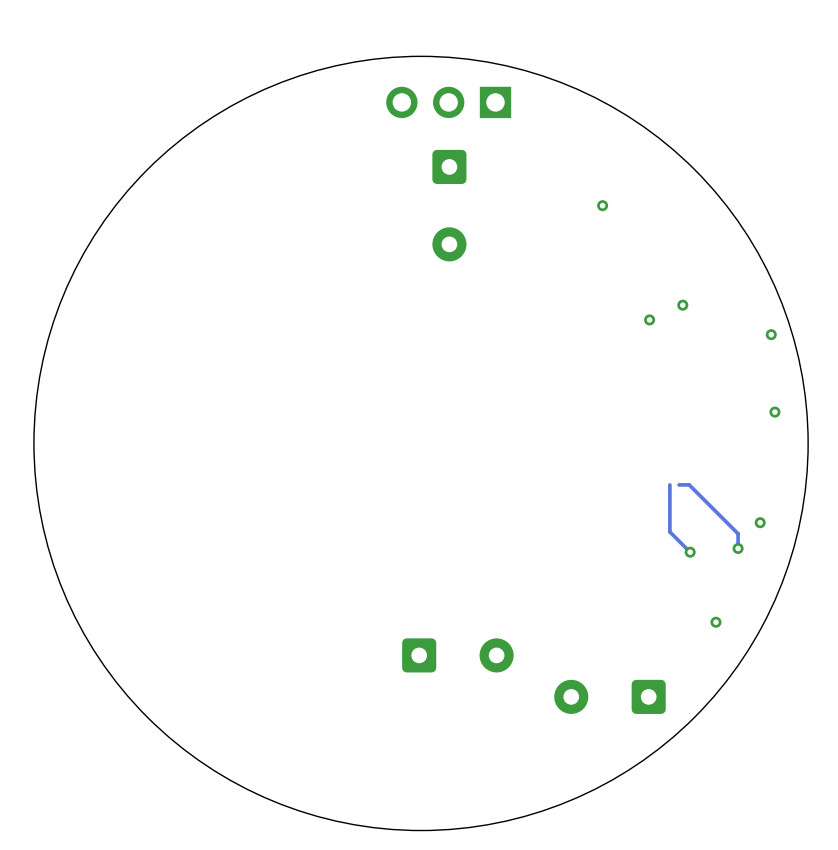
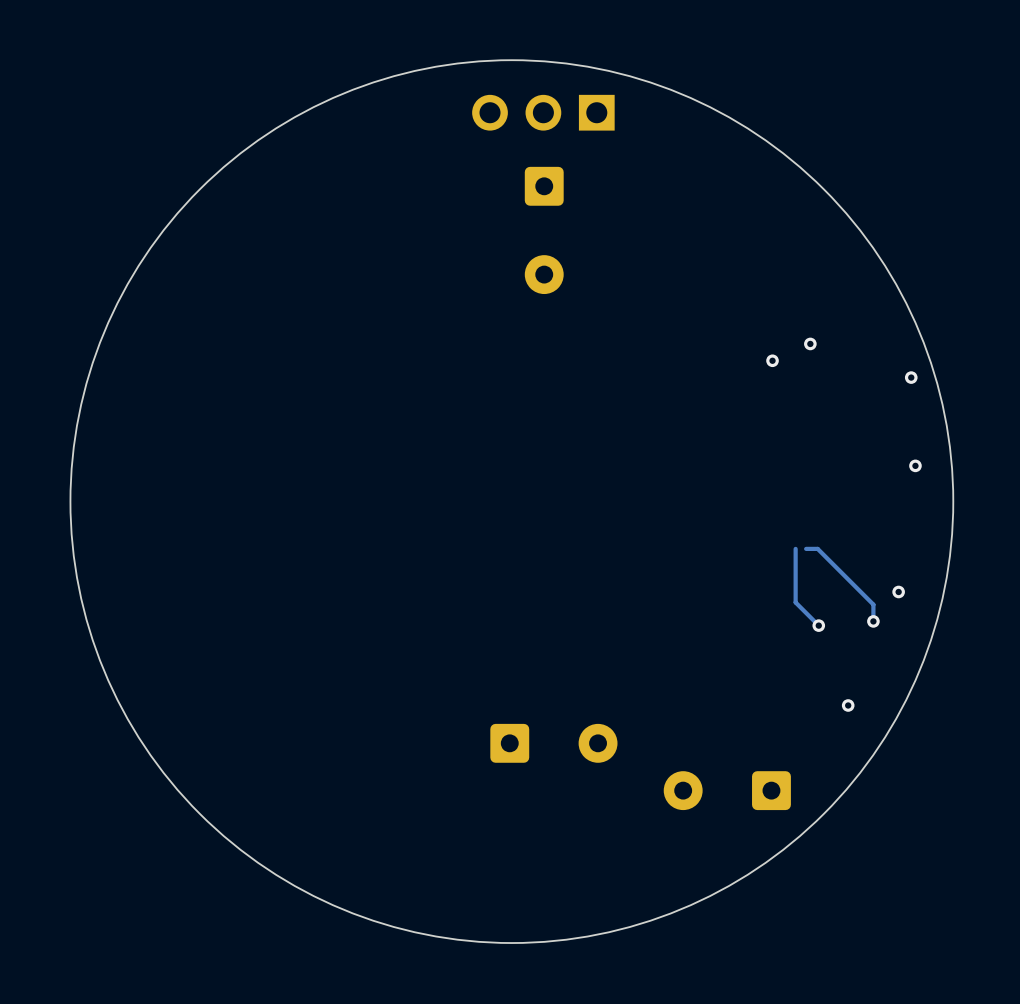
via: (602, 205) -> none

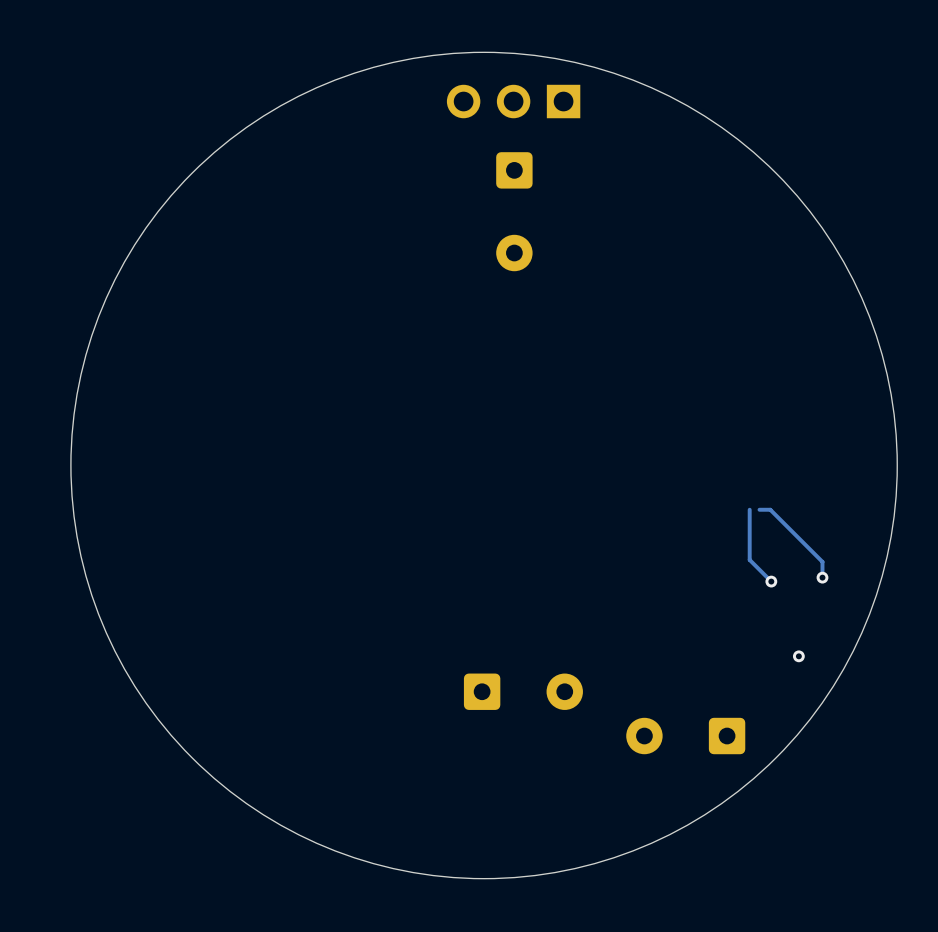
via: (810, 343) -> none
via: (772, 360) -> none
via: (911, 377) -> none
via: (915, 465) -> none
via: (898, 591) -> none

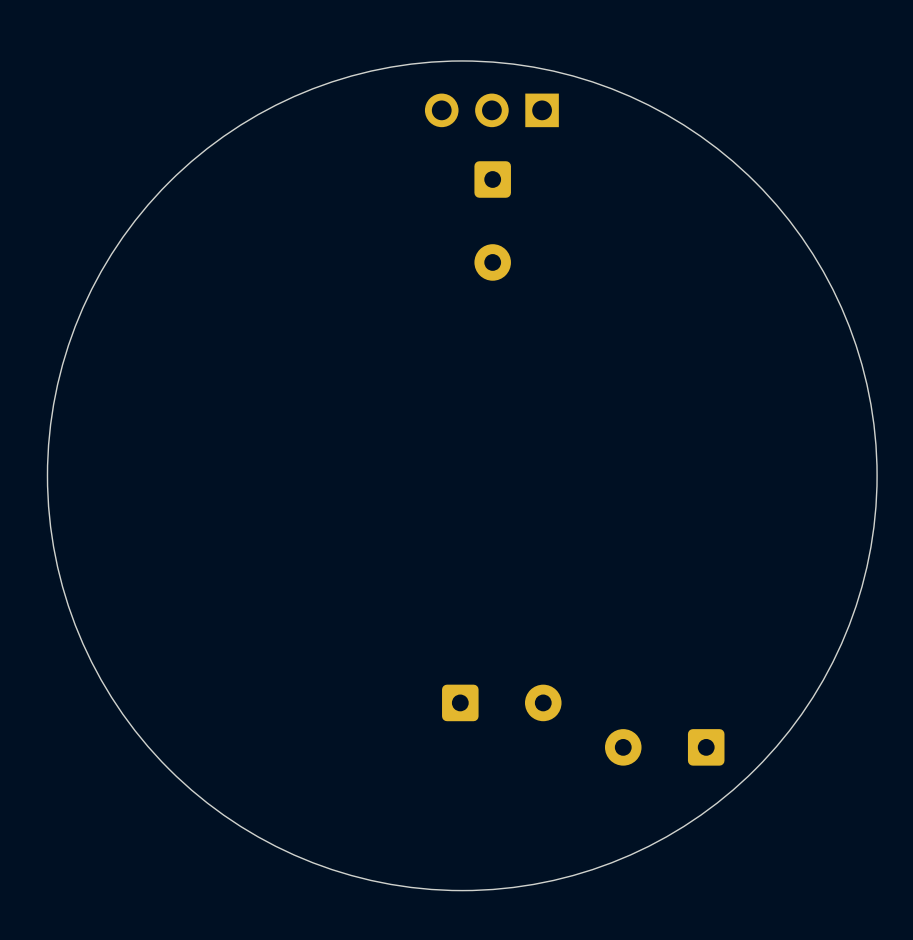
track: (749, 509) (749, 559) (771, 581) -> none
track: (759, 509) (770, 509) (822, 561) (822, 577) -> none
via: (822, 577) -> none
via: (771, 581) -> none
via: (798, 656) -> none

